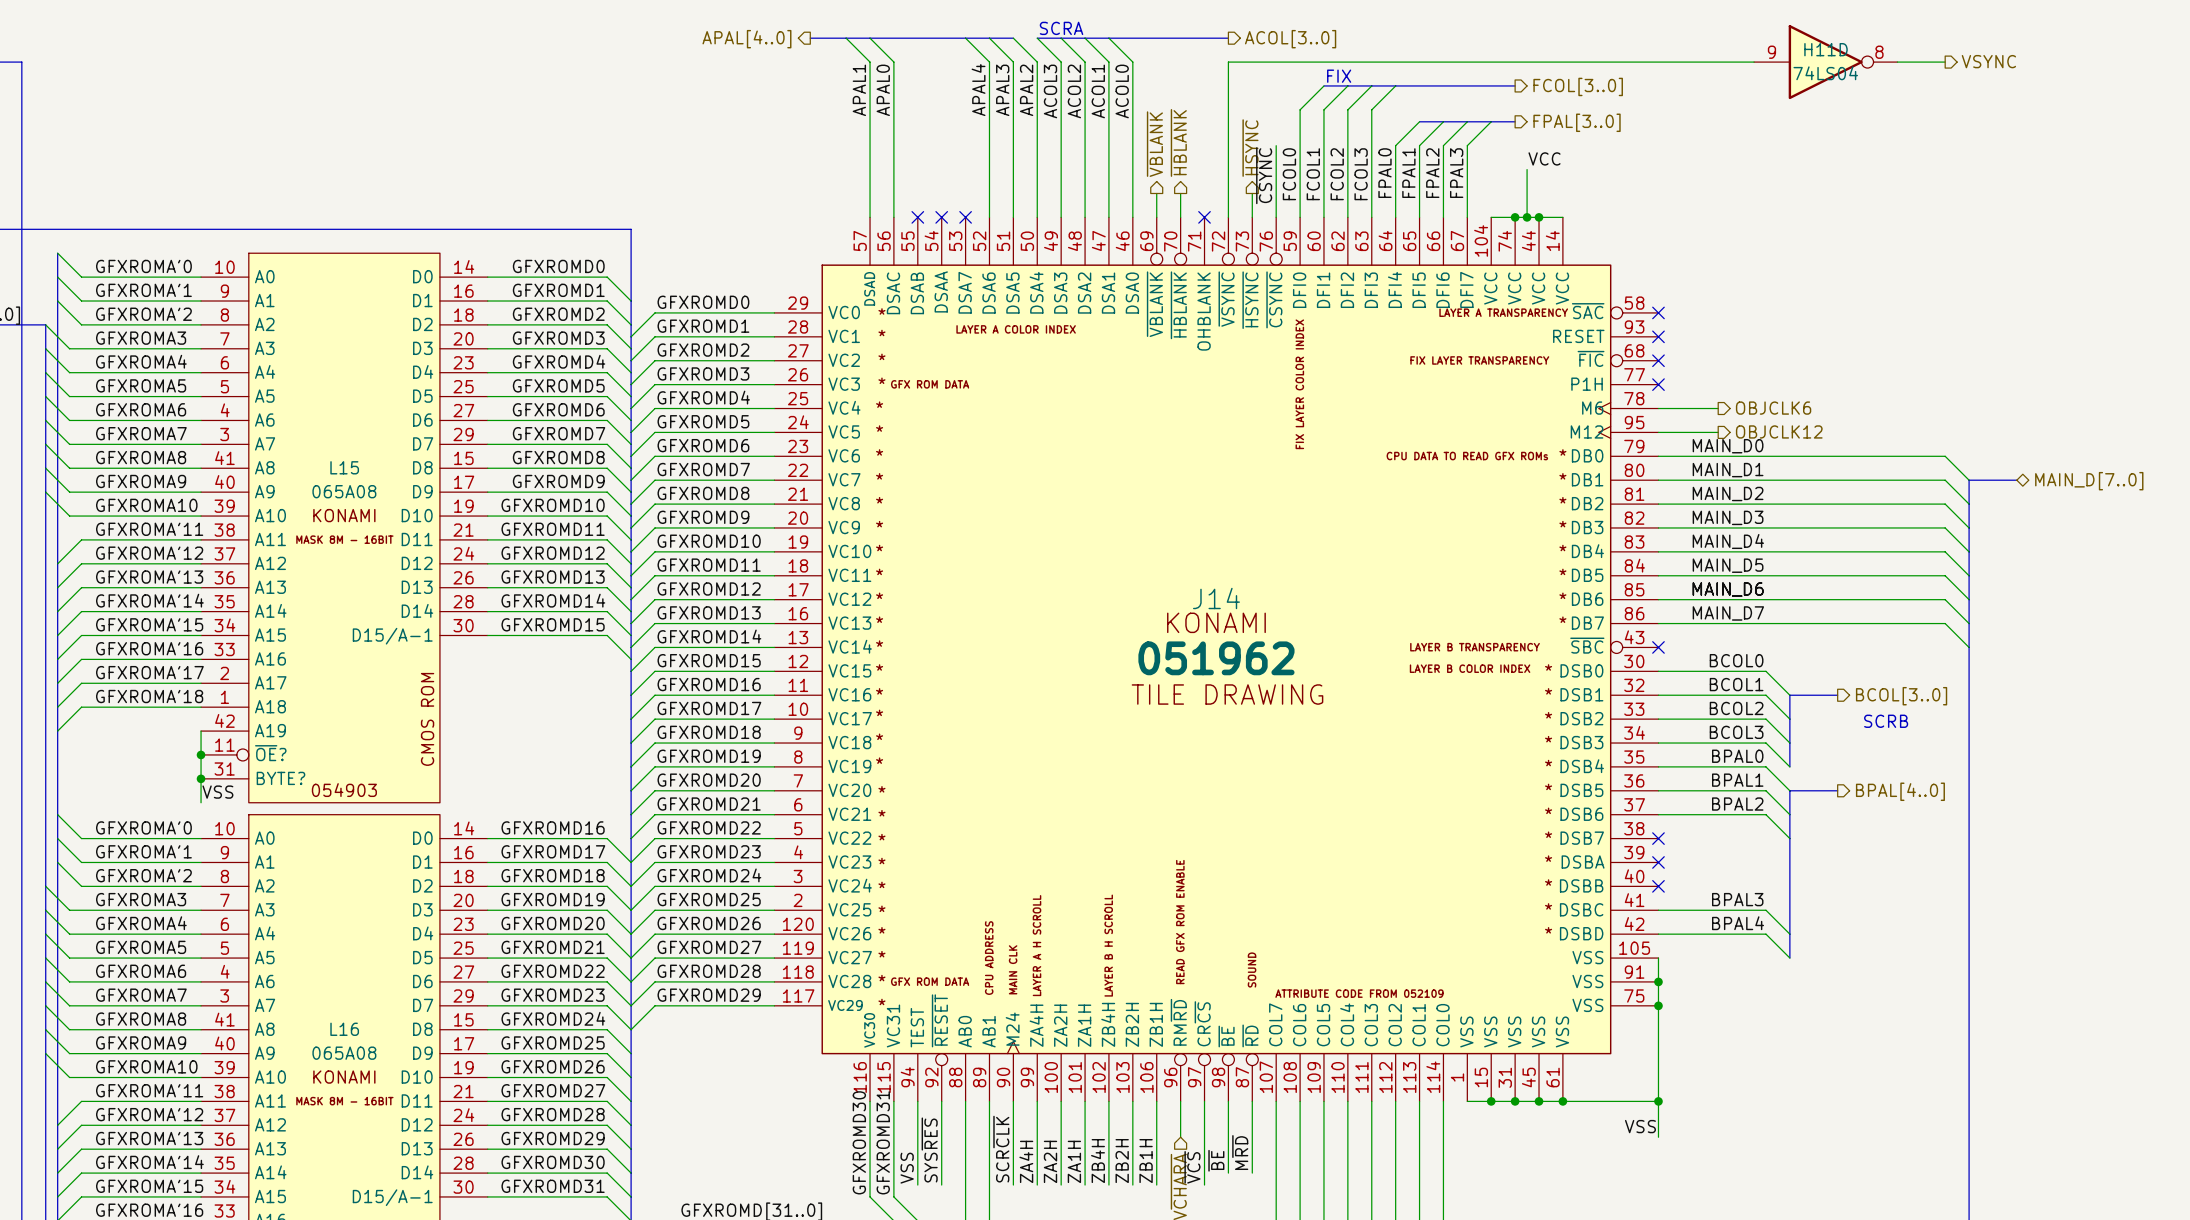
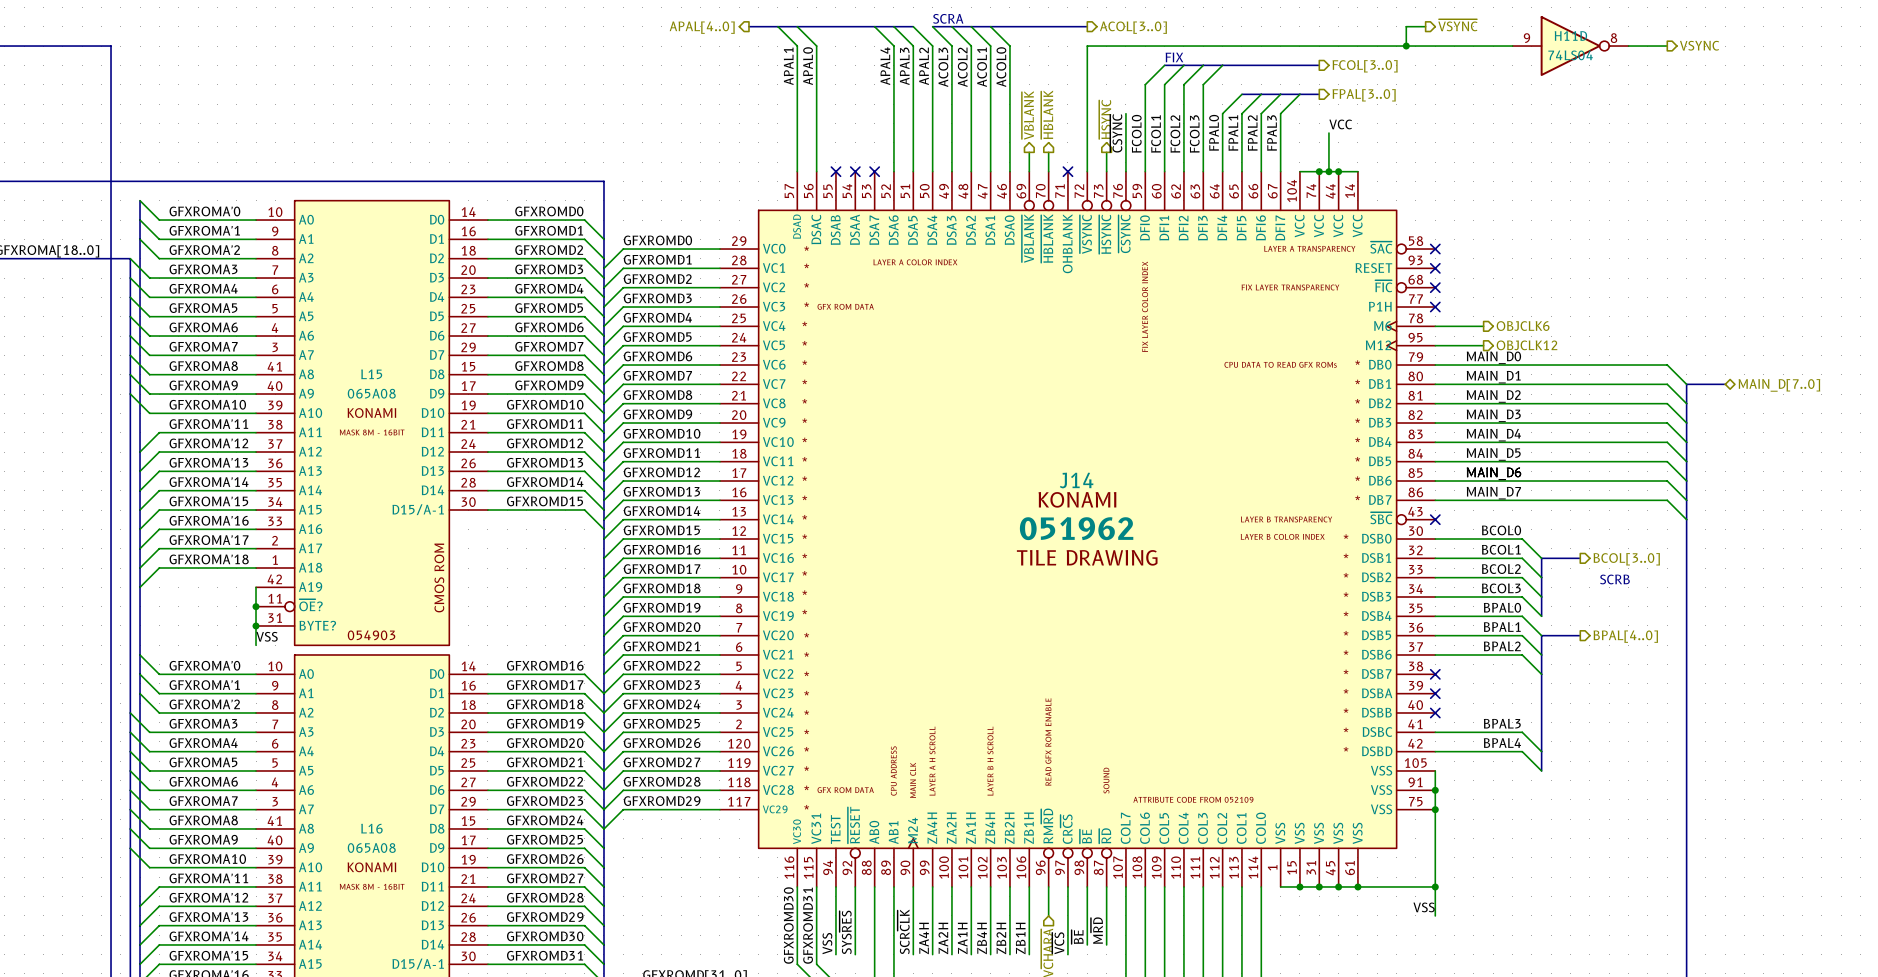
hierarchical label: none -> ~{VSYNC} (1457, 25)
wire: none -> (1425, 26) (1406, 26) (1406, 46)
junction: none -> (1406, 46)

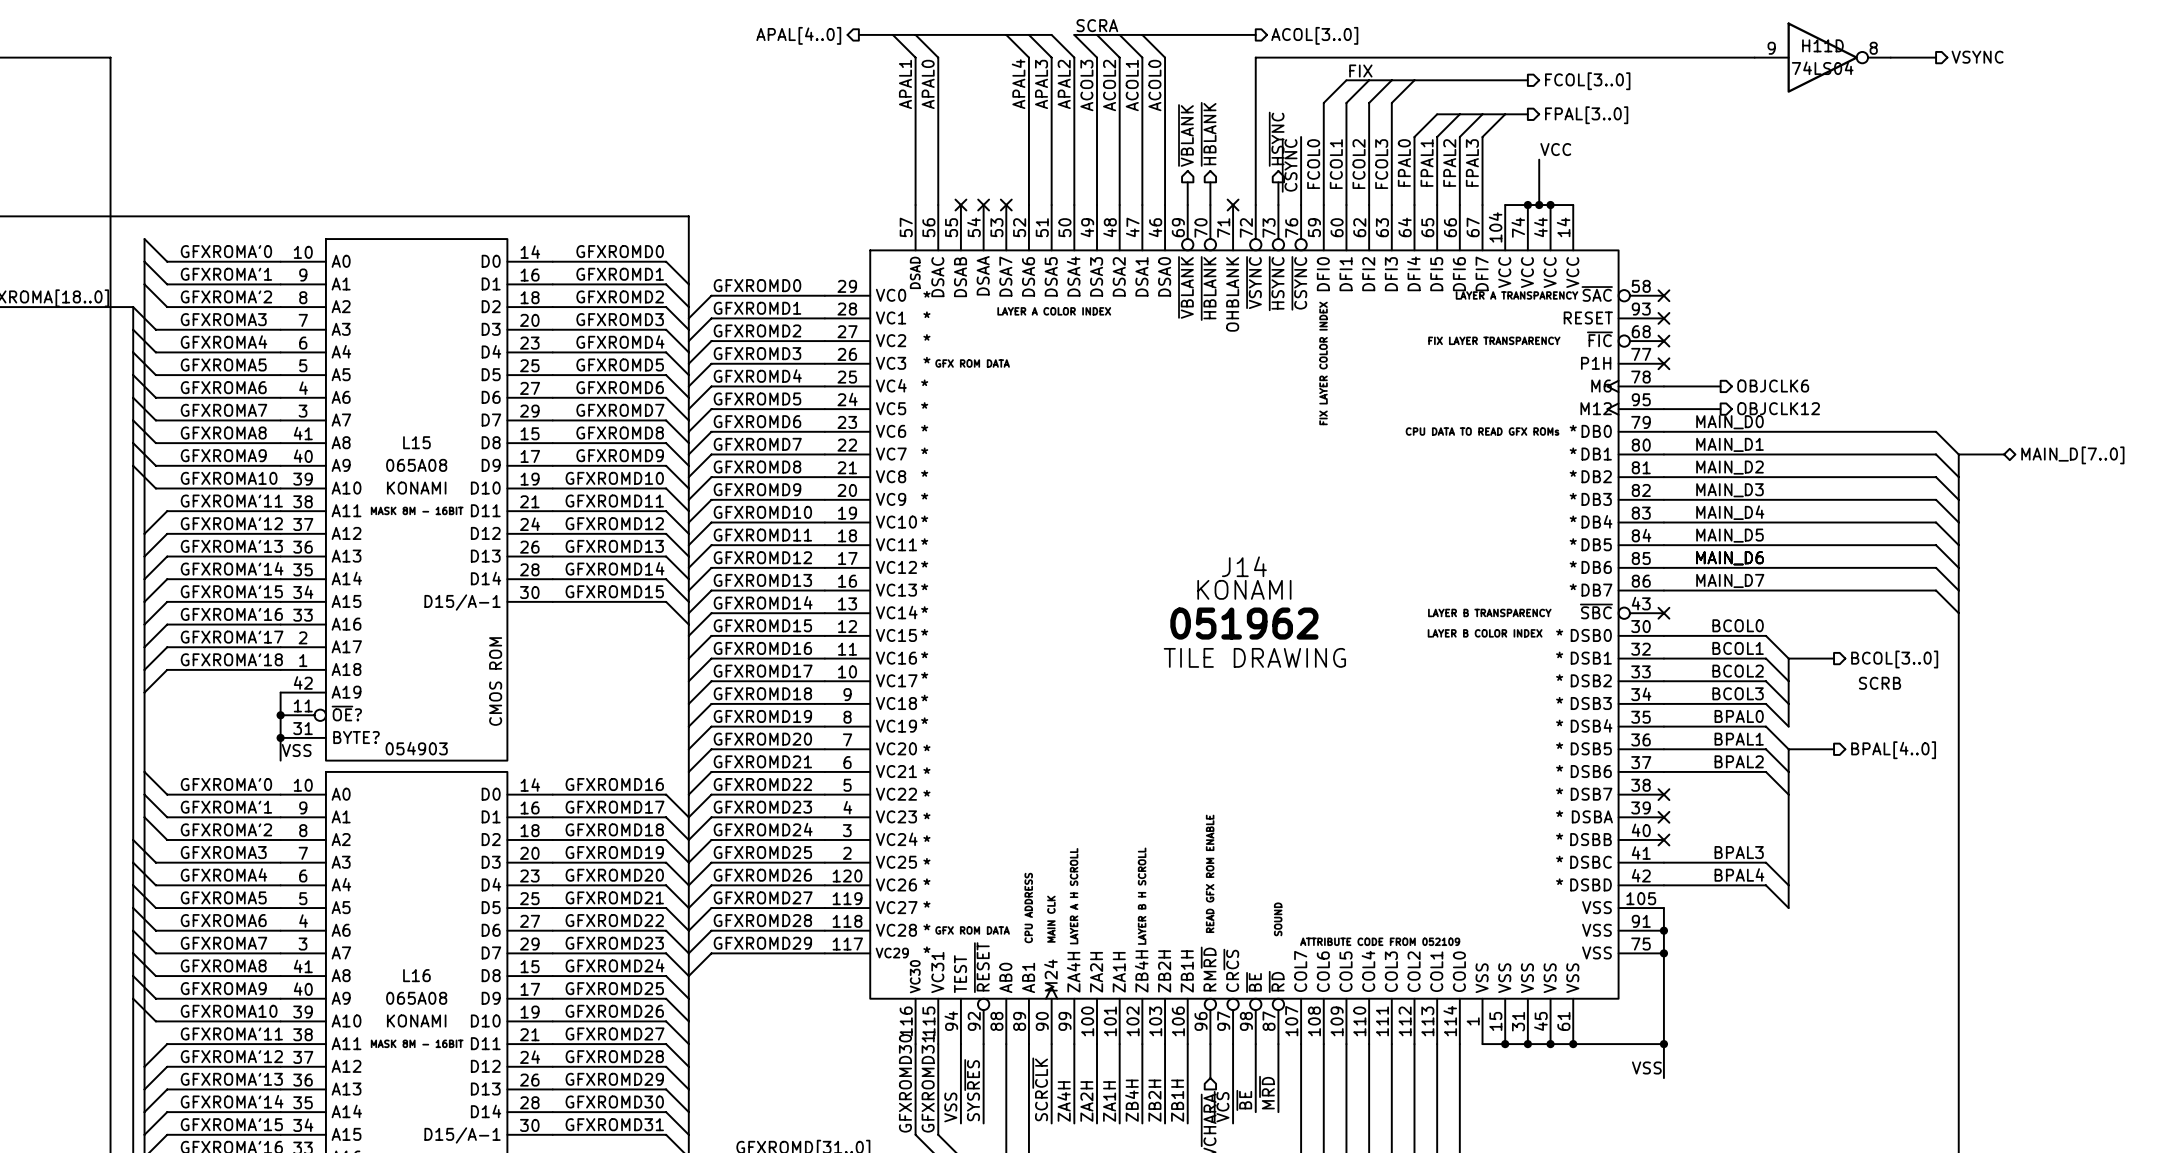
hierarchical label: ~{VSYNC} (1457, 25) -> none
wire: (1425, 26) (1406, 26) (1406, 46) -> none
junction: (1406, 46) -> none

